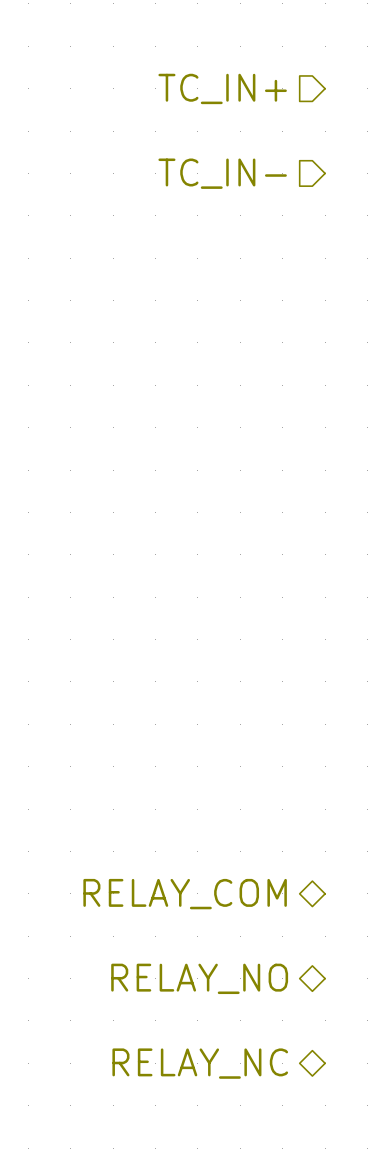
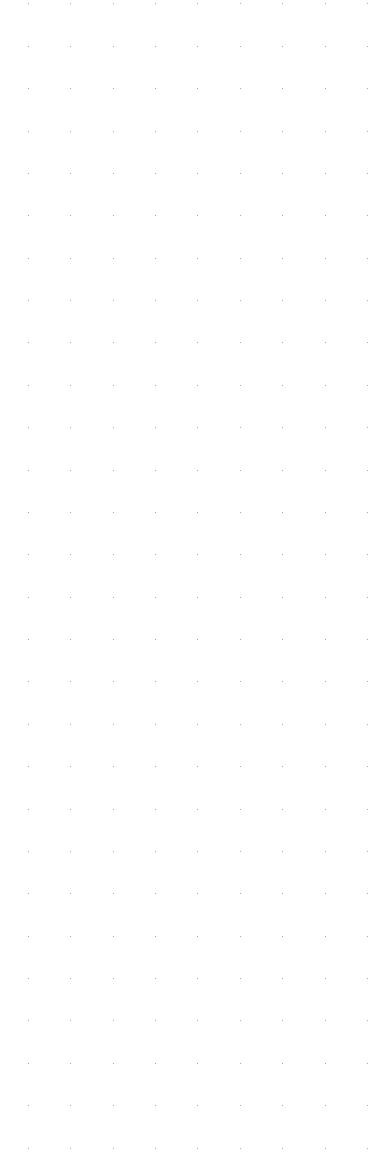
hierarchical label: TC_IN+ (222, 88) -> none
hierarchical label: TC_IN- (222, 173) -> none
hierarchical label: RELAY_COM (185, 894) -> none
hierarchical label: RELAY_NO (199, 978) -> none
hierarchical label: RELAY_NC (200, 1063) -> none

